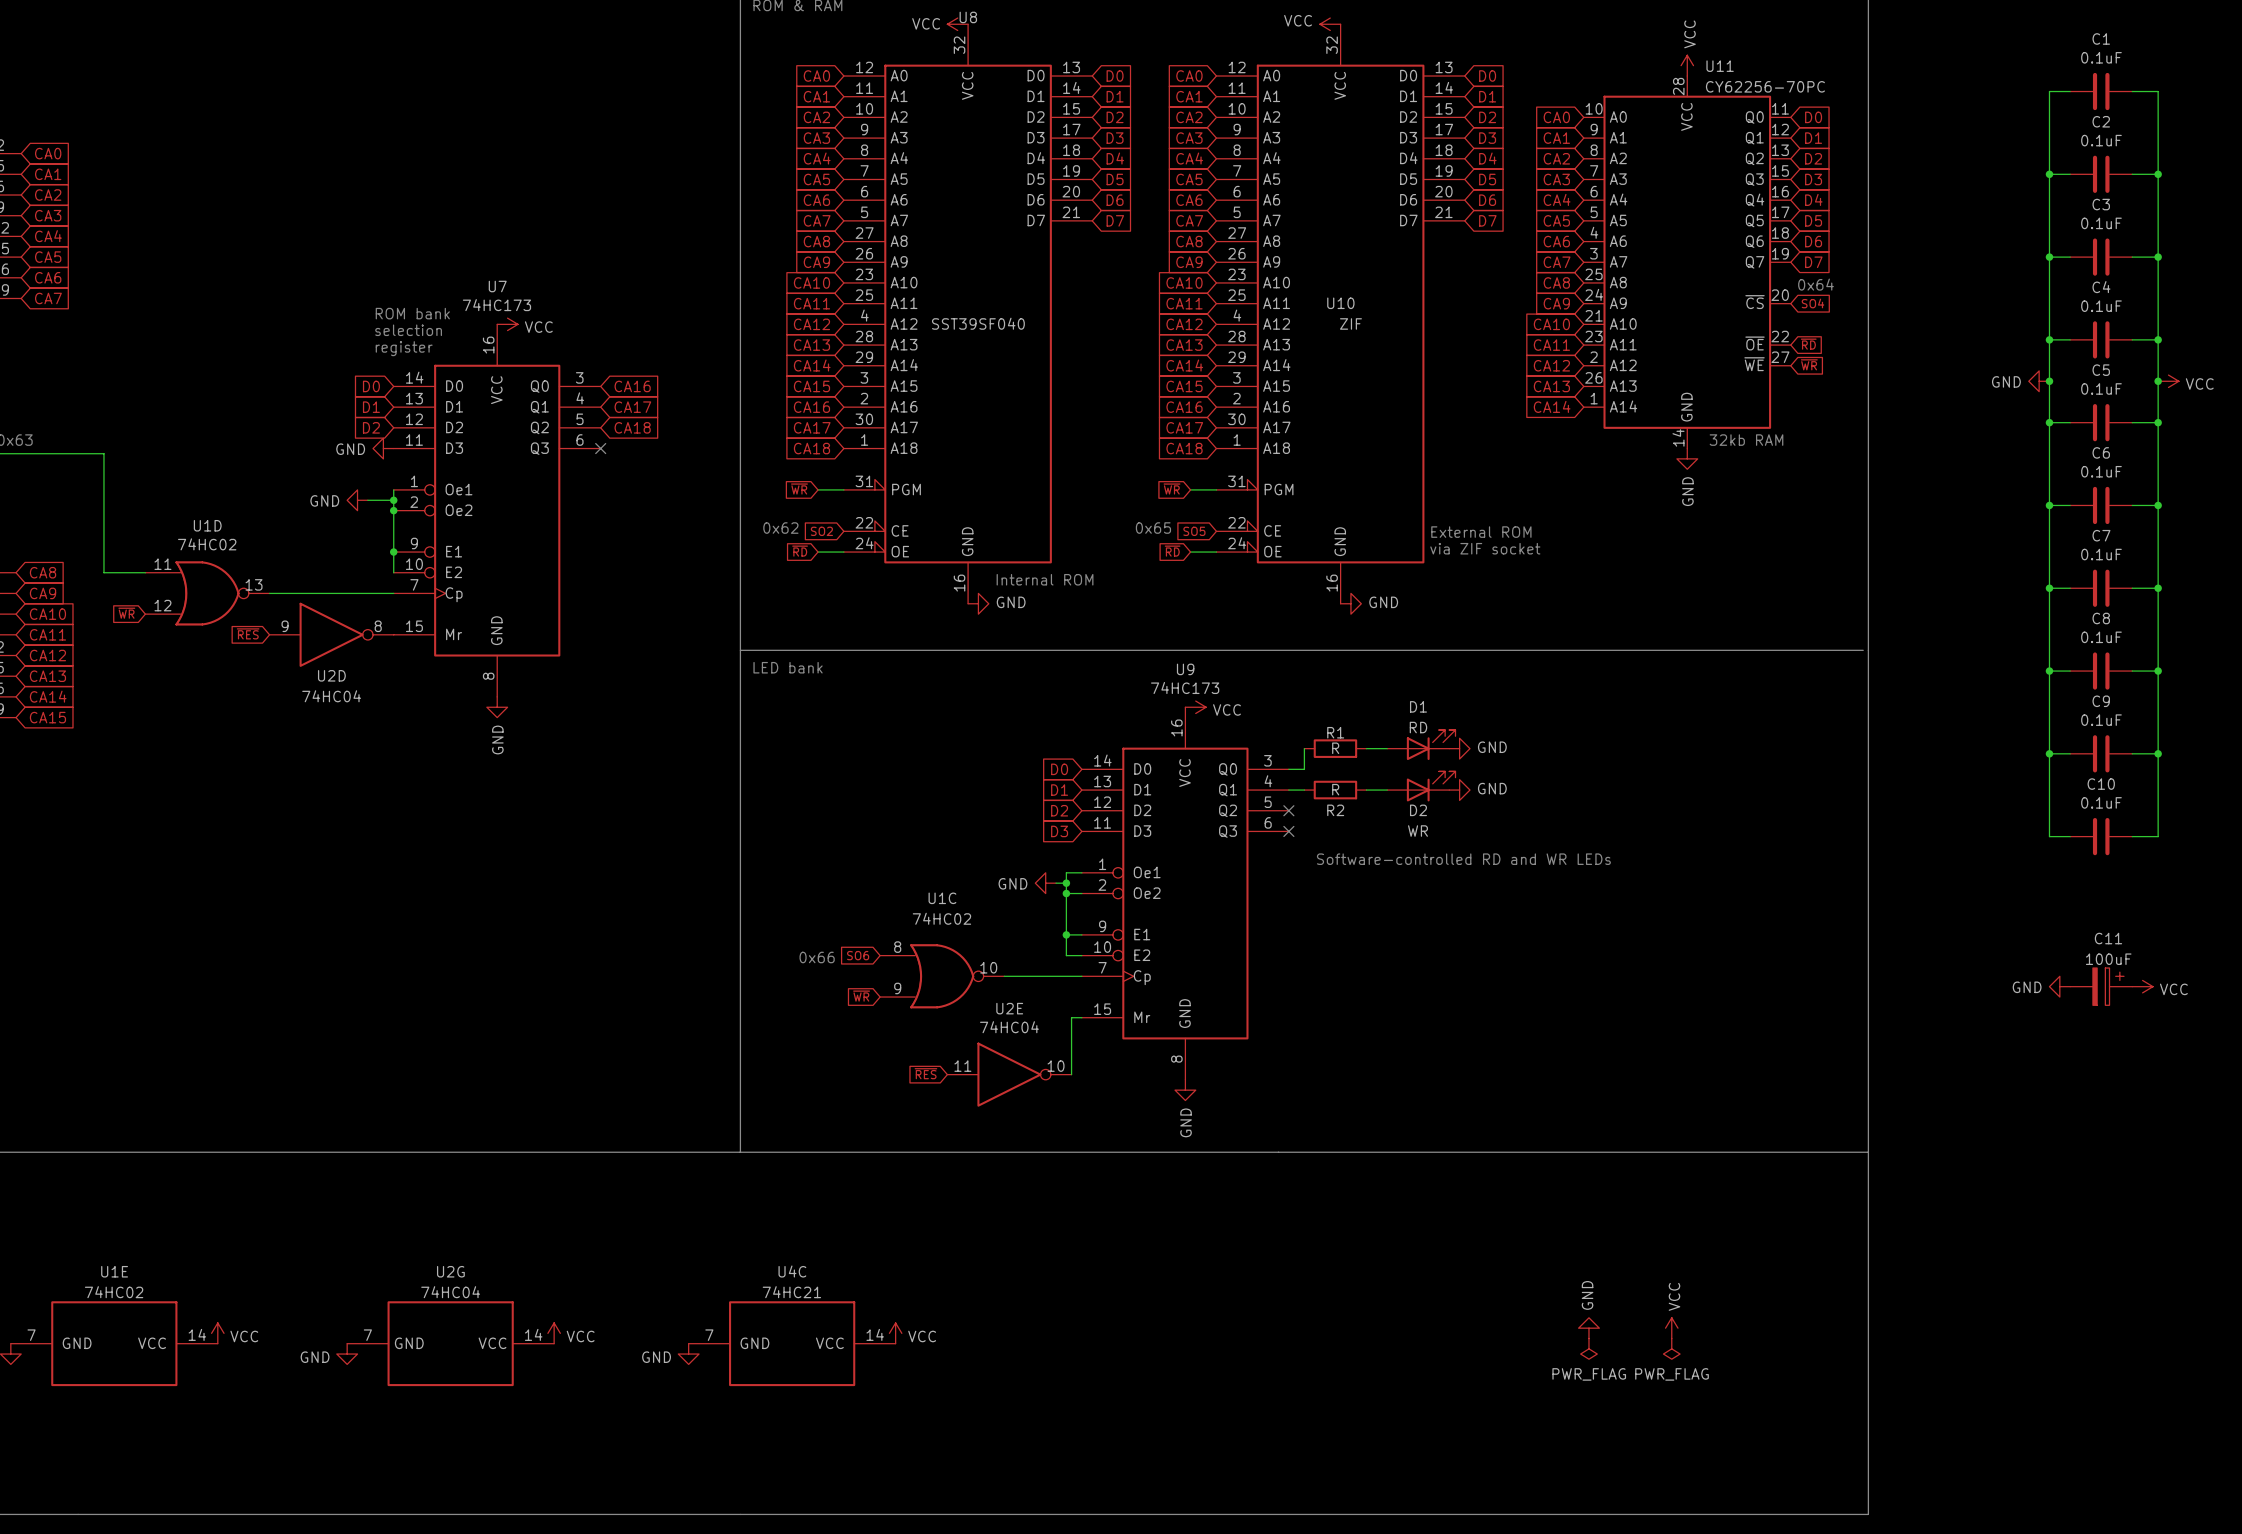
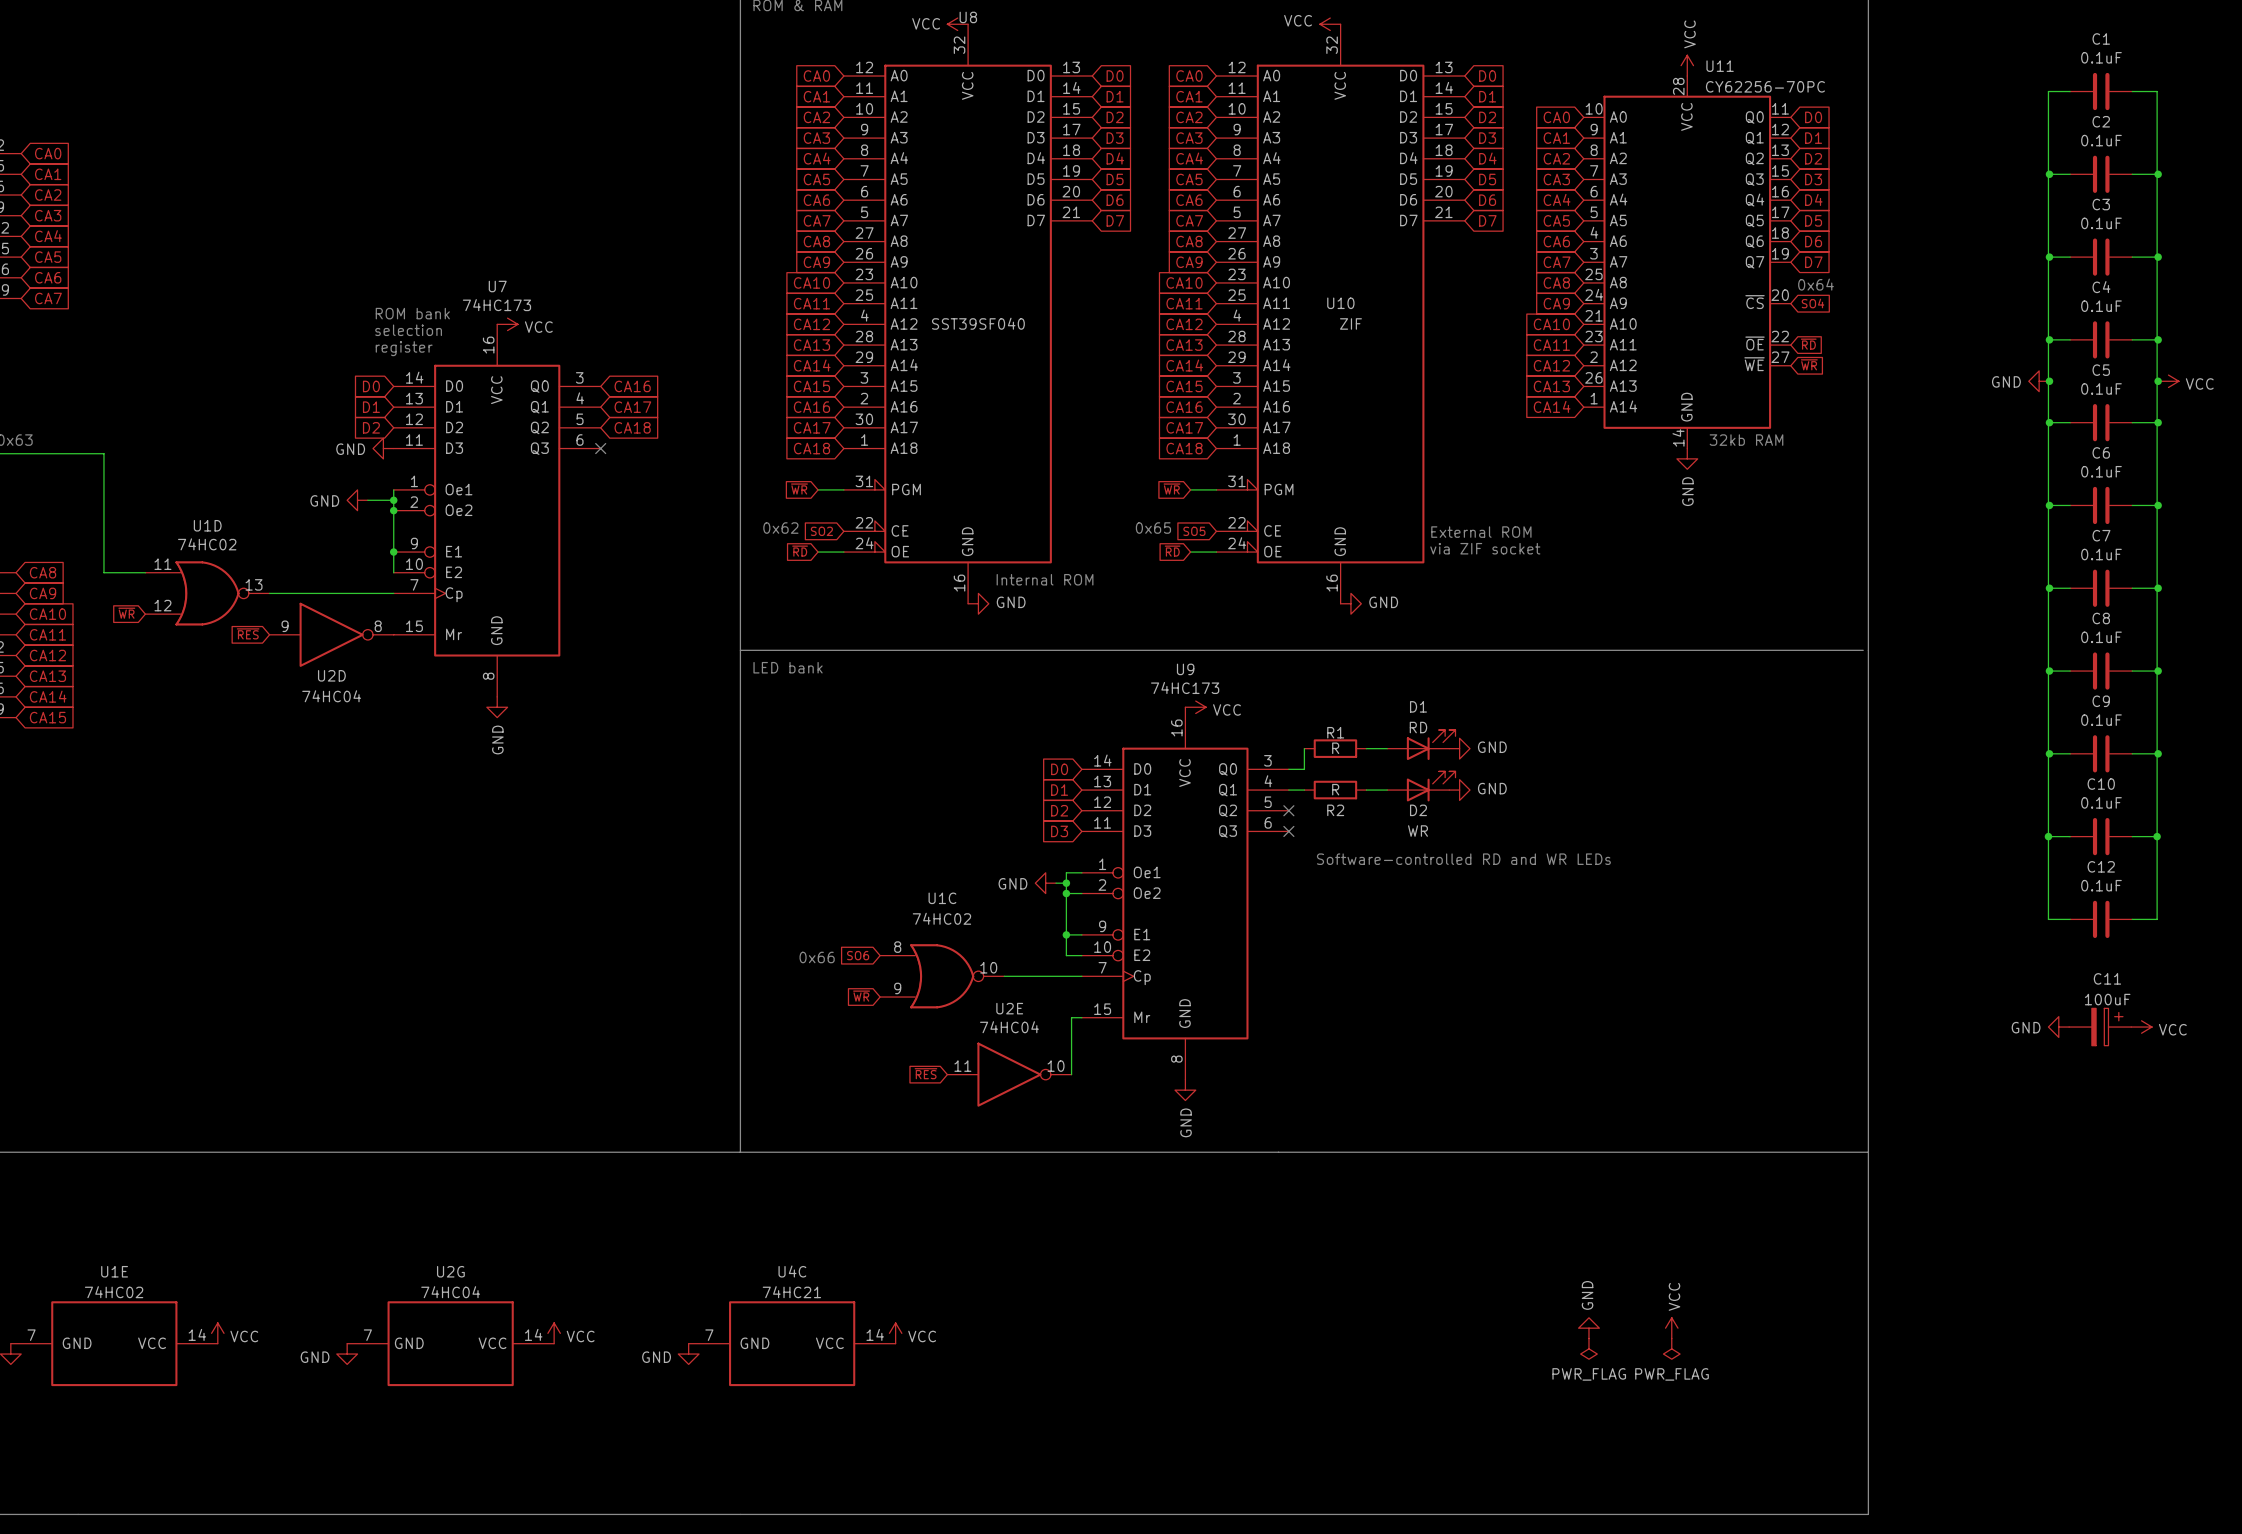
wire: (2049, 91) (2049, 836) -> (2049, 91) (2048, 919) (2070, 919)
wire: (2157, 91) (2157, 836) -> (2157, 91) (2157, 919) (2132, 919)
junction: none -> (2048, 836)
junction: none -> (2157, 836)
C12: none -> 0.1uF (2101, 919)
power symbol position: GND (2059, 986) -> GND (2058, 1027)
C11 position: (2101, 986) -> (2100, 1027)
power symbol position: VCC (2142, 986) -> VCC (2141, 1027)

